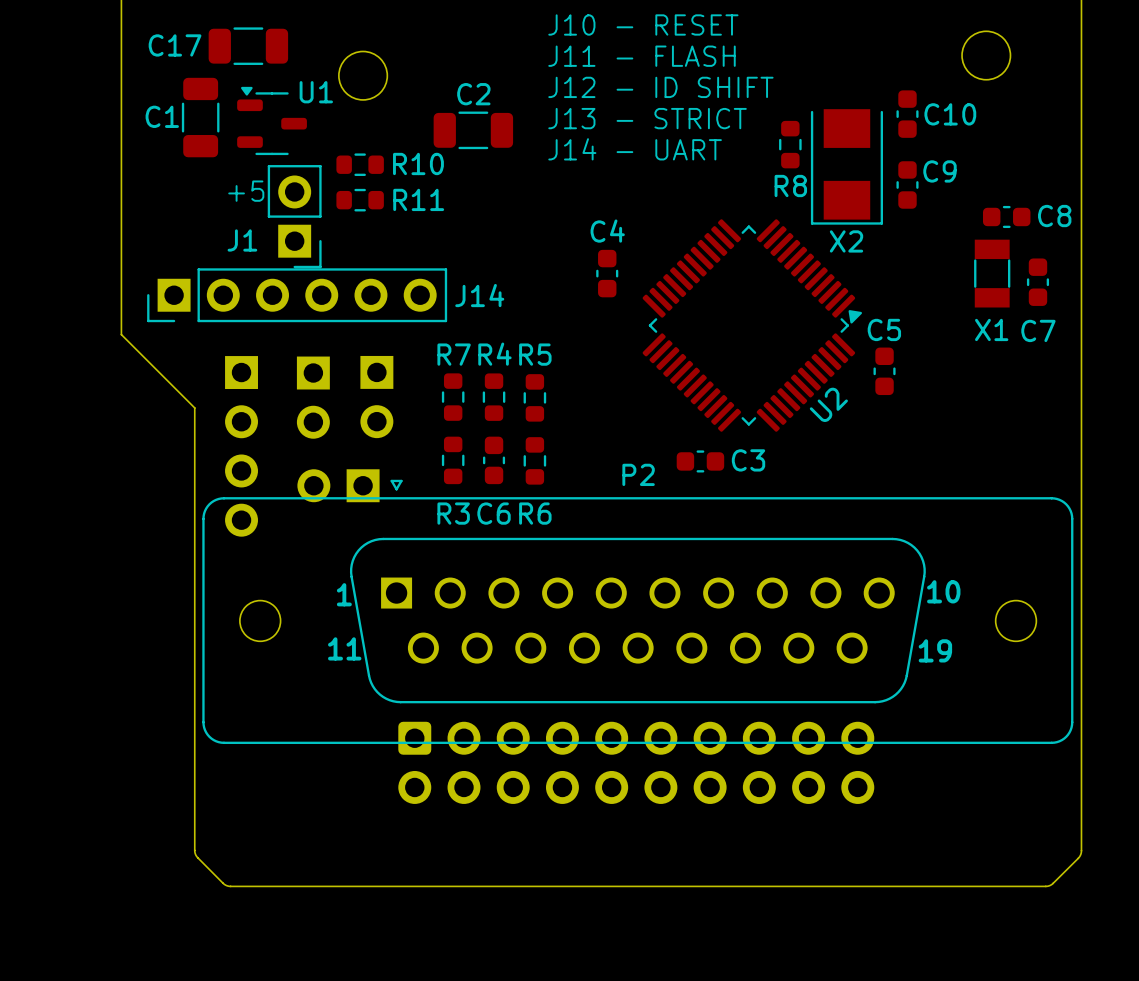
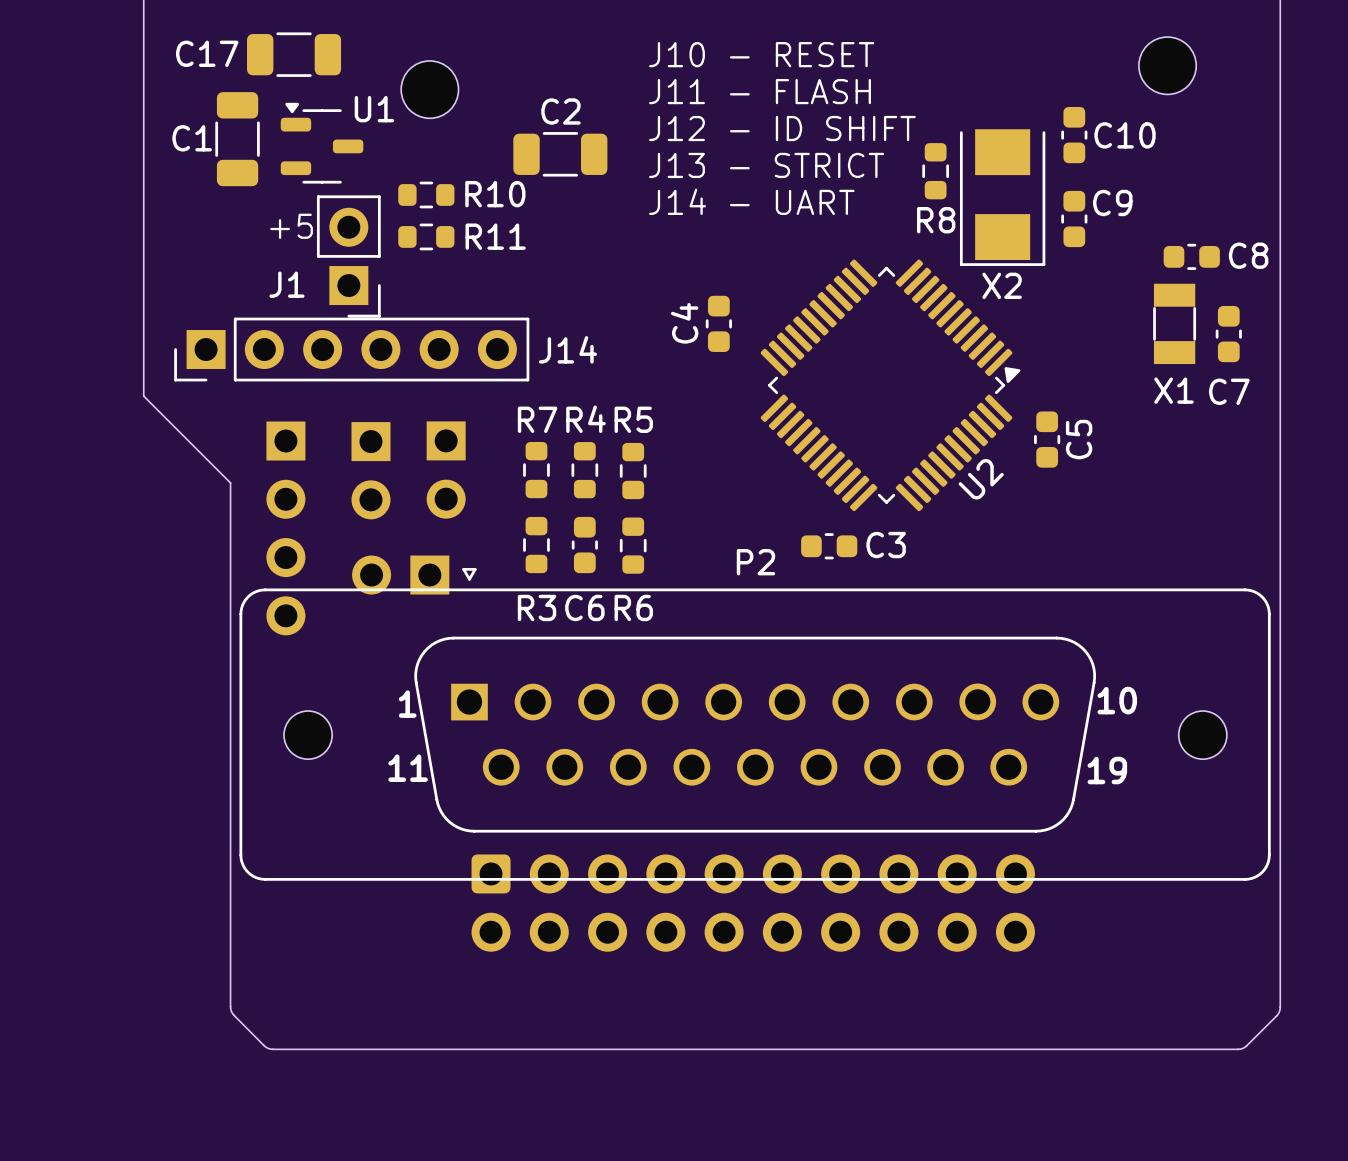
text: J10 - RESET (643, 24) -> none
text: J11 - FLASH (642, 56) -> J10 - RESET (761, 54)
text: J12 - ID SHIFT (660, 87) -> J11 - FLASH (760, 91)
text: J13 - STRICT (647, 118) -> J12 - ID SHIFT (782, 128)
text: J14 - UART (635, 149) -> J13 - STRICT (766, 165)
text: none -> J14 - UART (751, 201)
C4 name rotation: 0° (607, 231) -> 90° counterclockwise (684, 323)
C4 name position: C4 (607, 231) -> C4 (684, 323)
C5 name rotation: 0° (884, 329) -> 90° counterclockwise (1079, 439)
C5 name position: C5 (884, 329) -> C5 (1079, 439)

